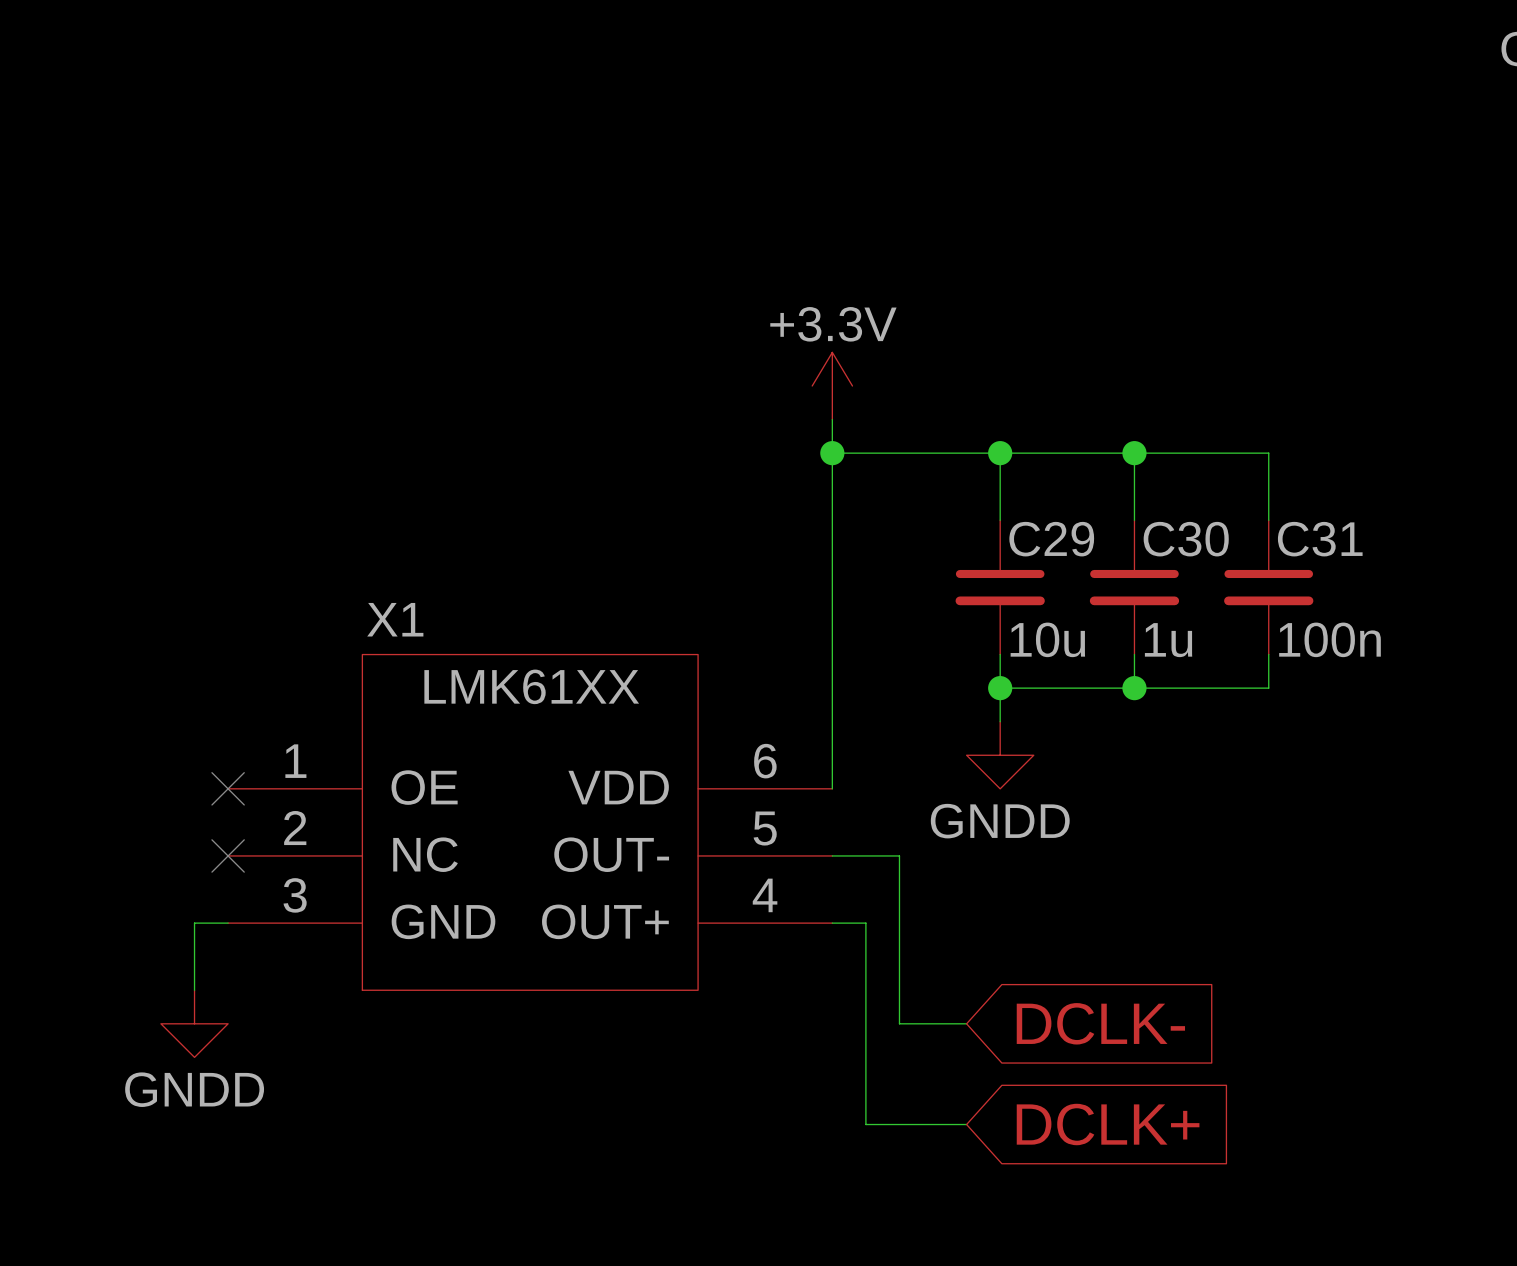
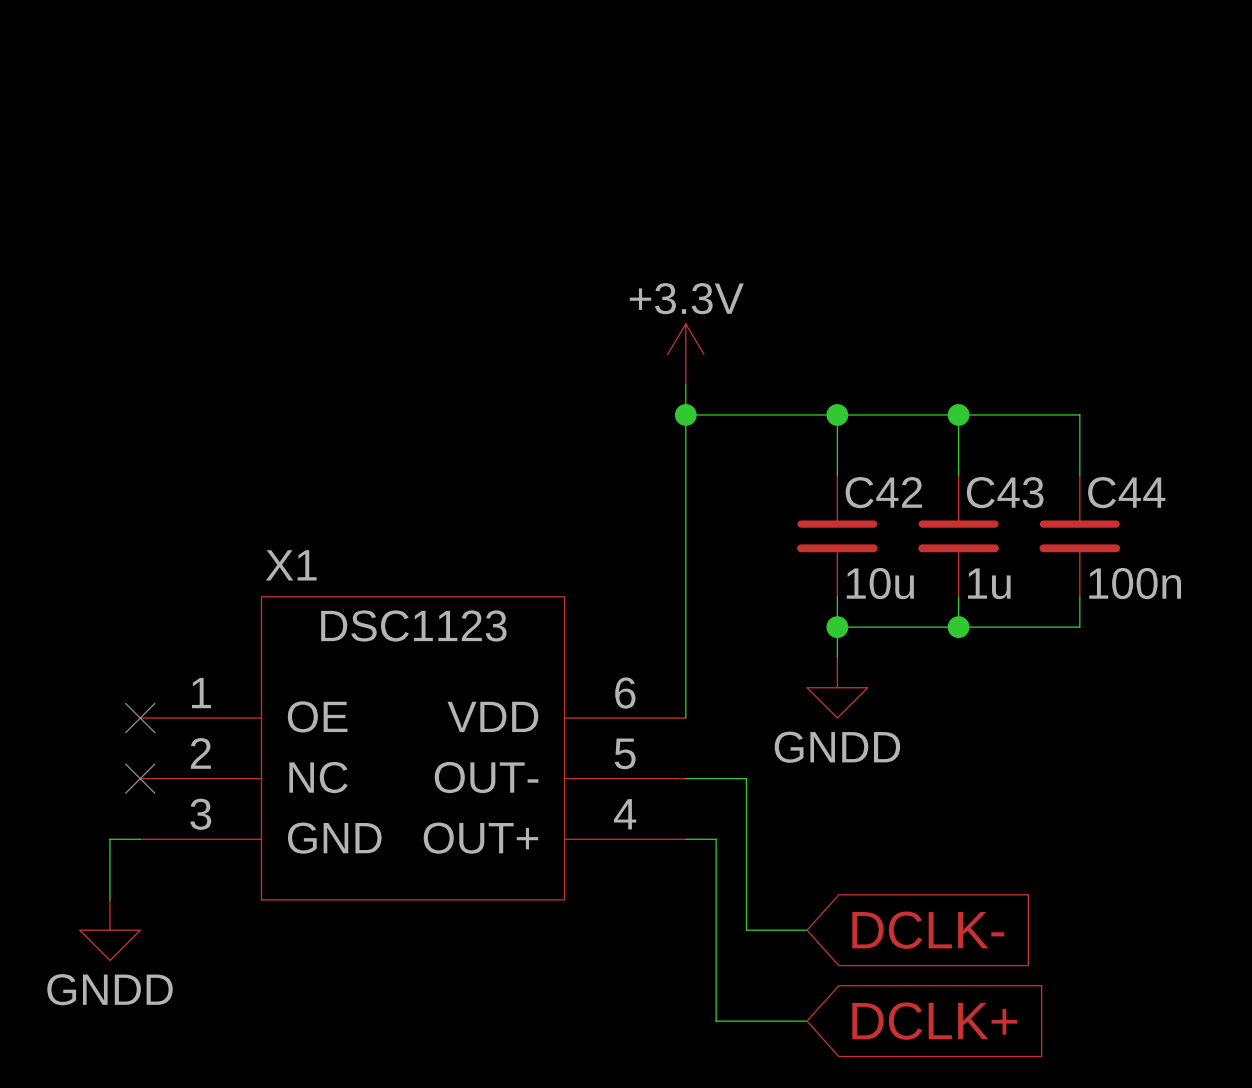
C29 name: C29 (1051, 539) -> C42 (883, 492)
C30 name: C30 (1186, 539) -> C43 (1005, 492)
C31 name: C31 (1320, 539) -> C44 (1126, 492)
X1 value: LMK61XX (531, 686) -> DSC1123 (413, 625)

